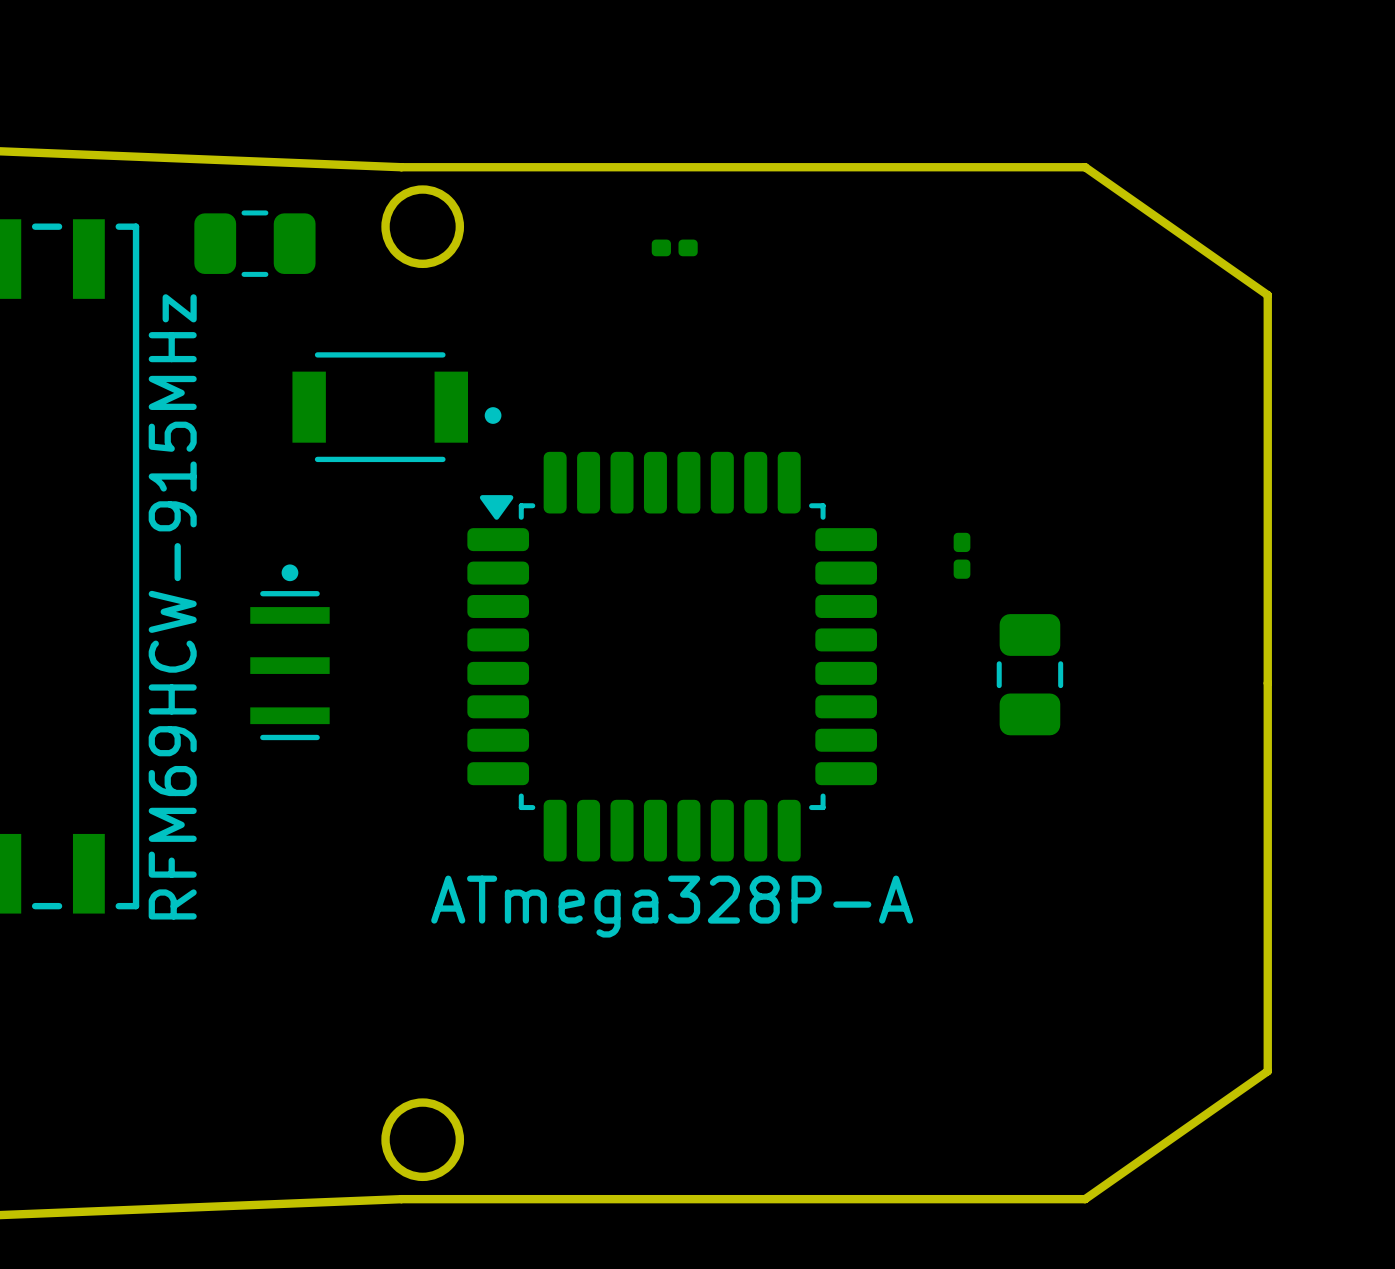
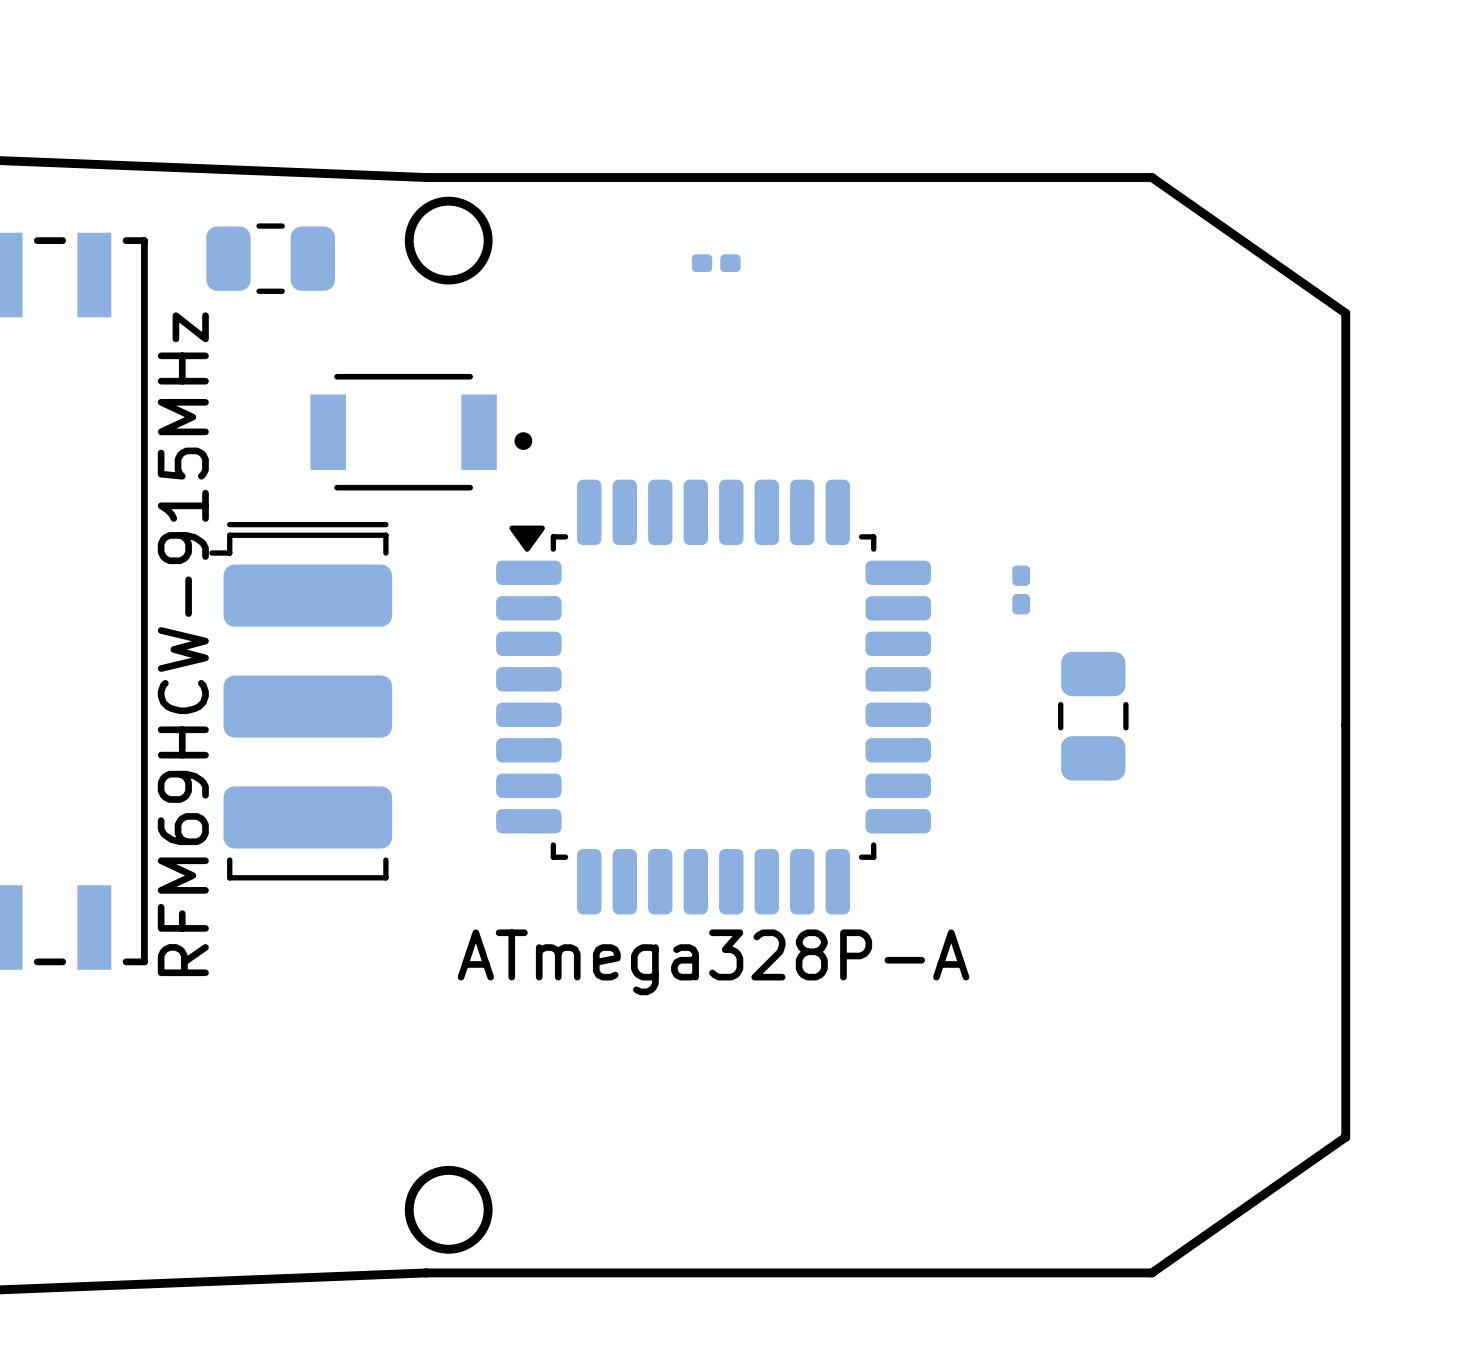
part footprint: [250, 564, 330, 741] -> [209, 521, 393, 881]

